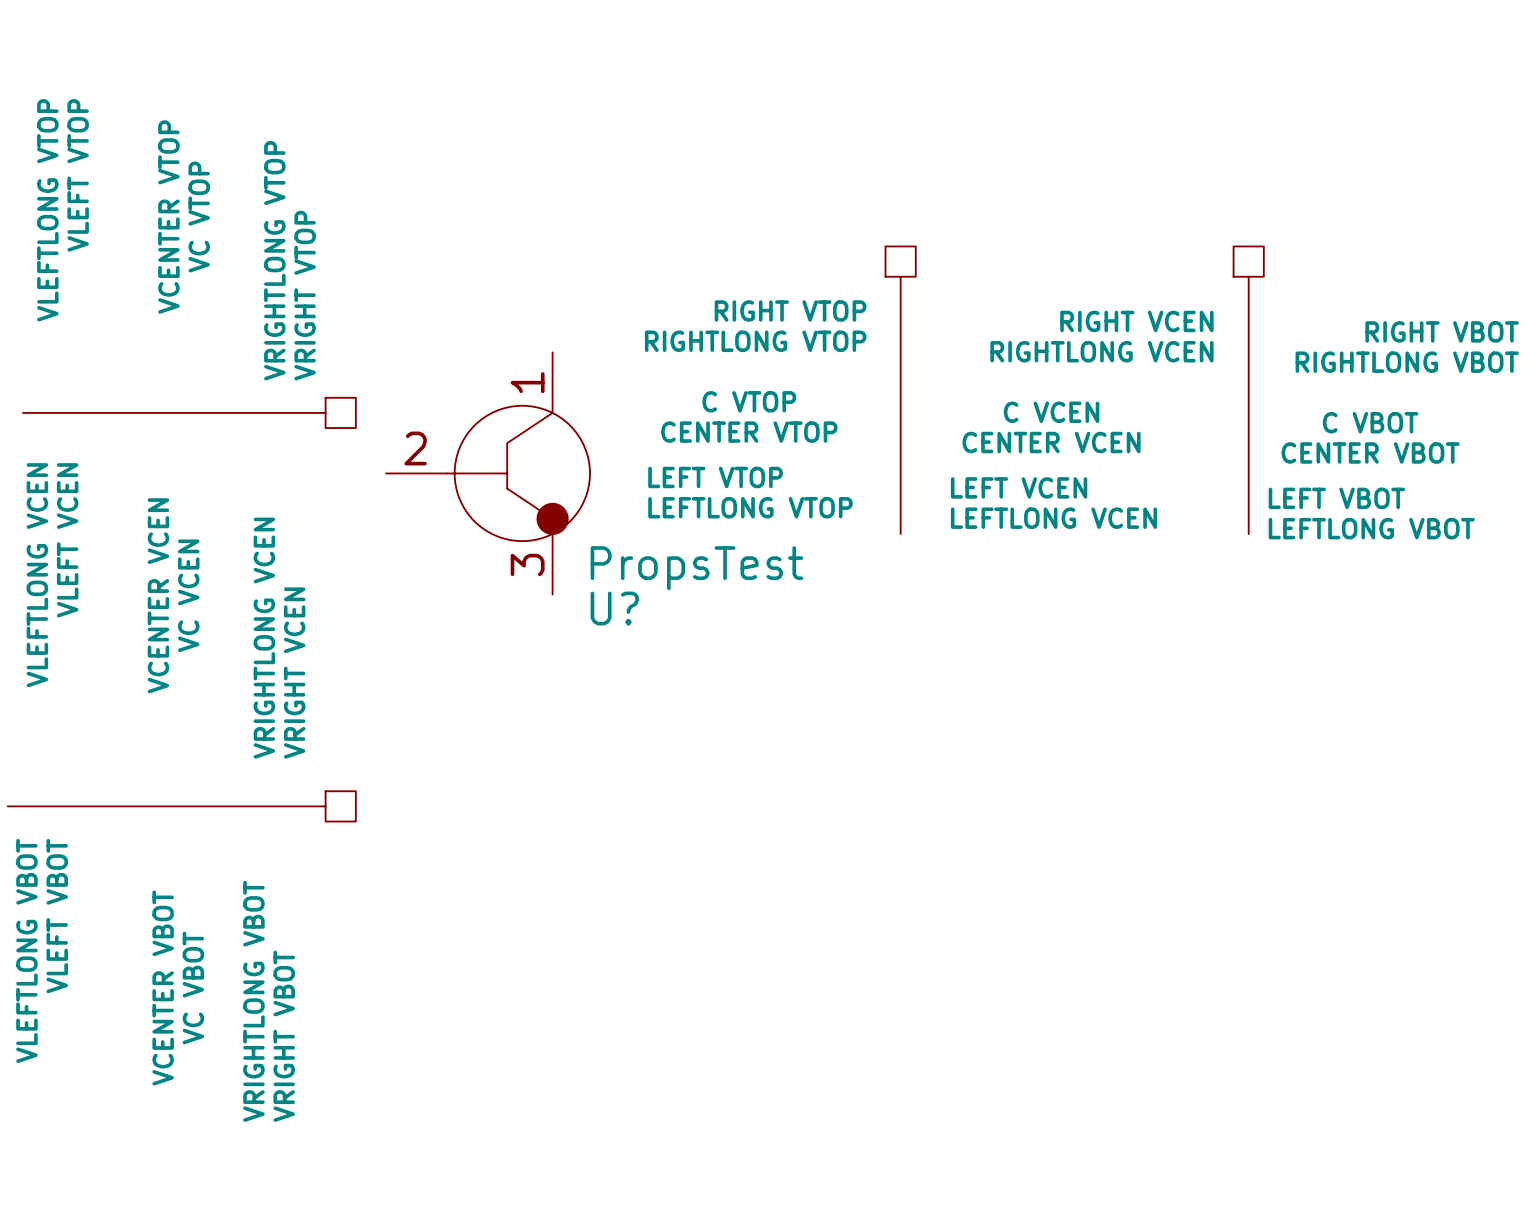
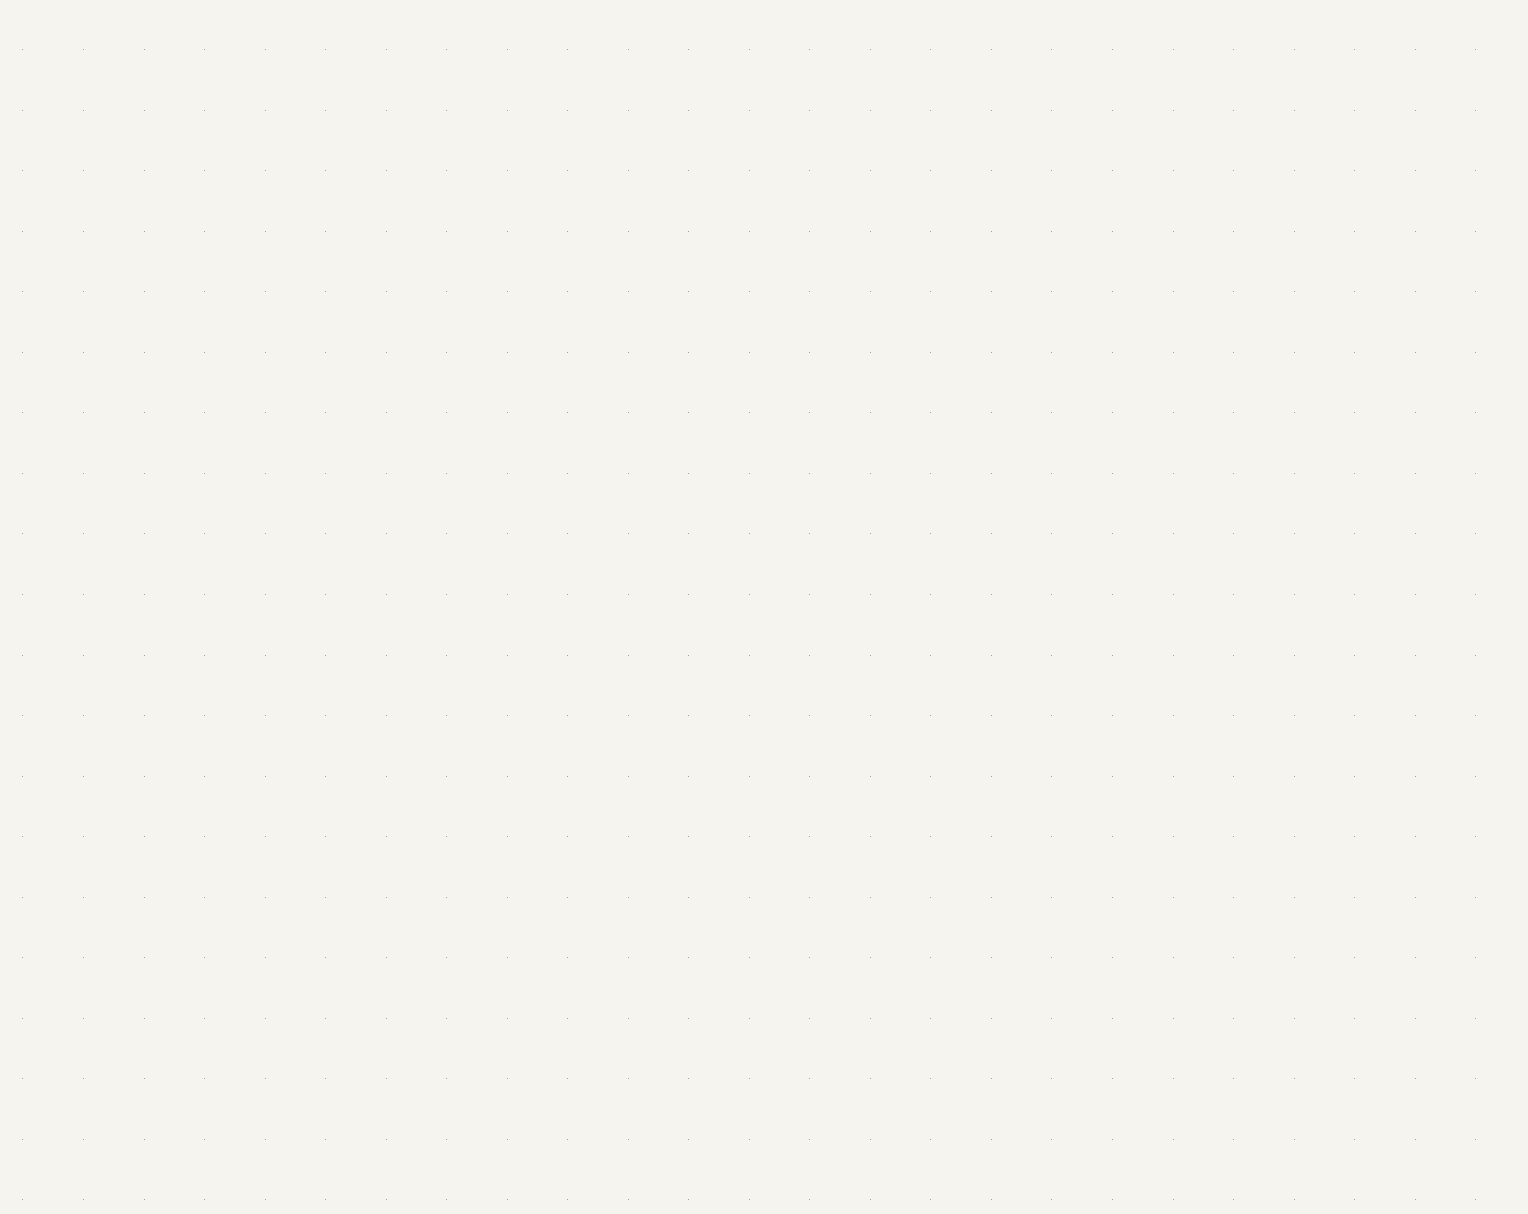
U?: PropsTest (635, 533) -> none

